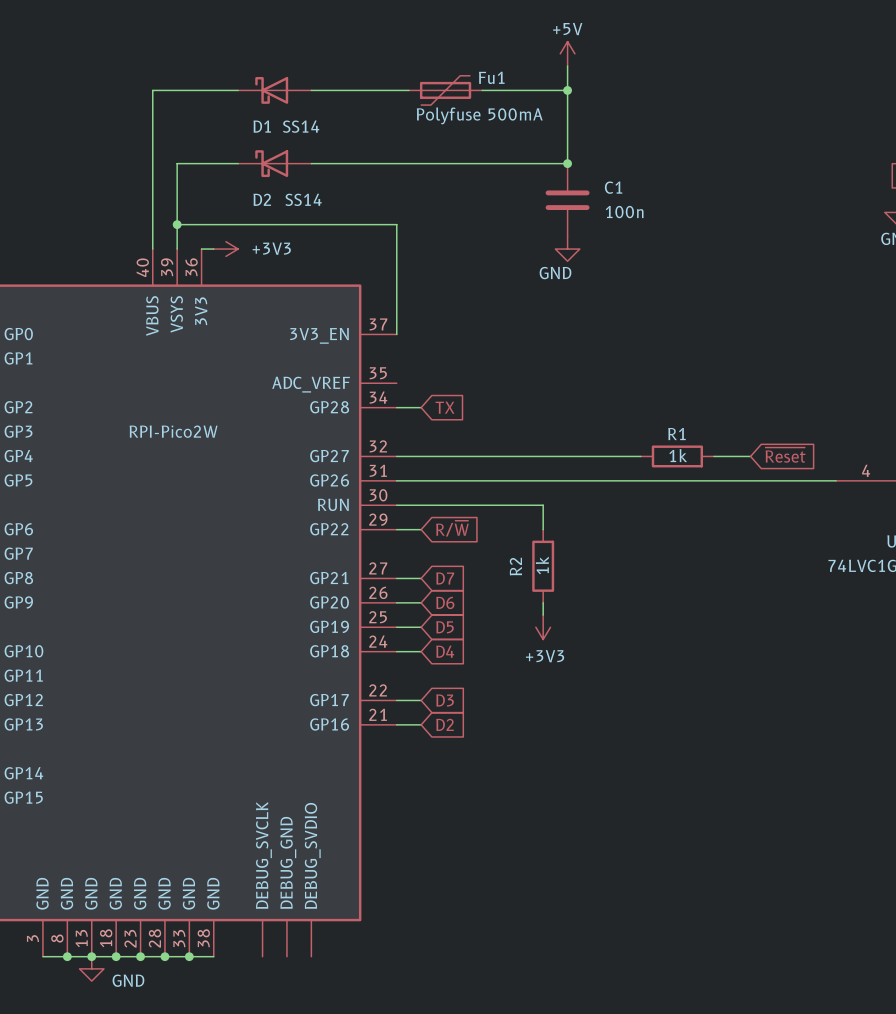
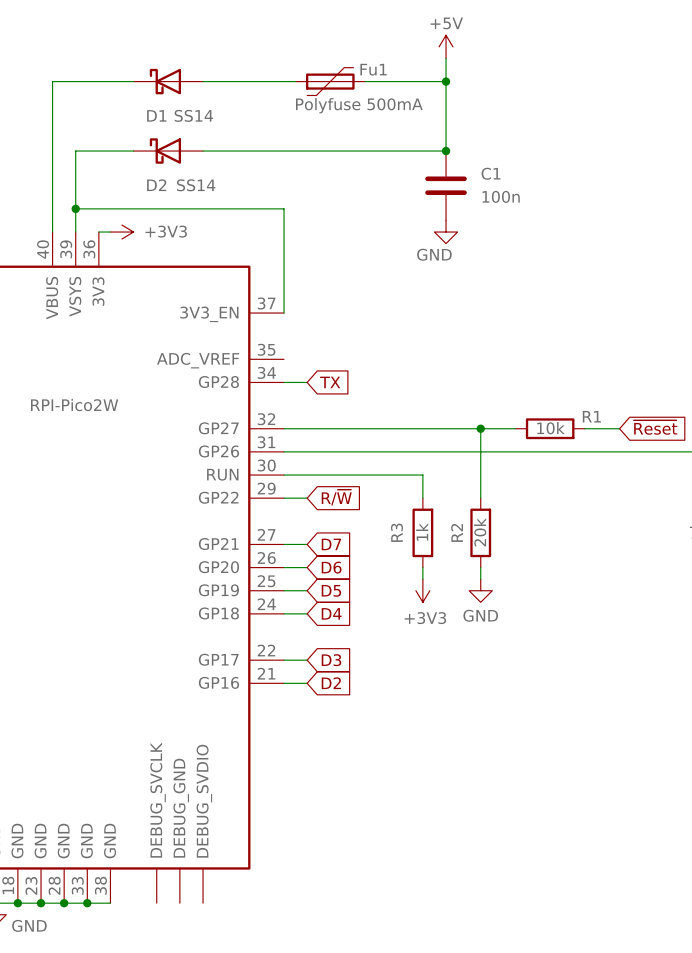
R1 name position: R1 (677, 434) -> R1 (591, 416)
R1 value: 1k (678, 455) -> 10k (551, 428)
wire: none -> (480, 428) (480, 498)
junction: none -> (480, 428)
R2 name: R2 (515, 566) -> R3 (396, 532)
R2: none -> 20k (480, 532)
wire: none -> (480, 567) (480, 579)
power symbol: none -> GND (480, 590)

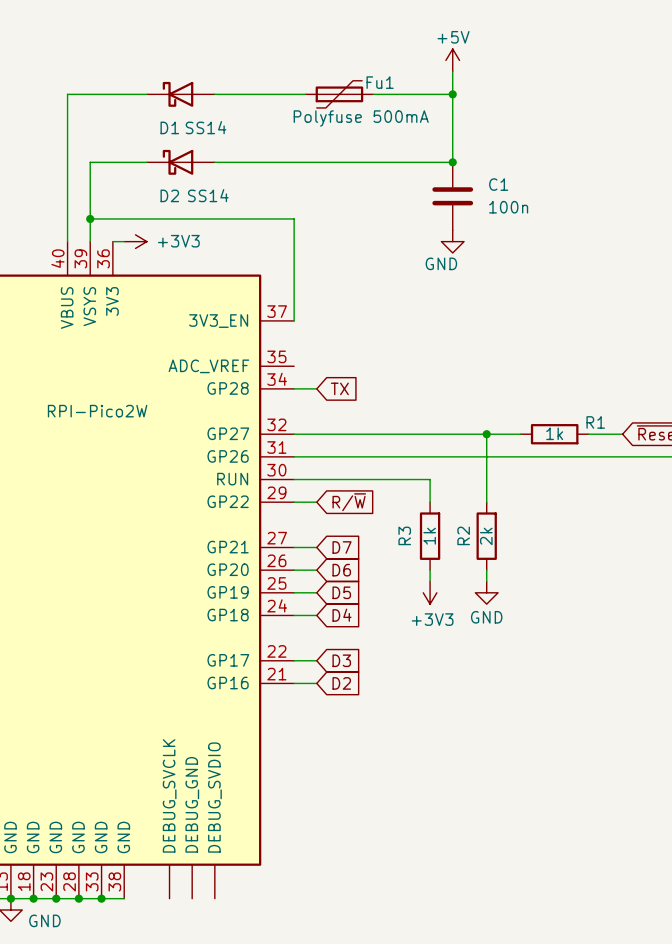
R1 value: 10k (551, 428) -> 1k (554, 433)
R2 value: 20k (480, 532) -> 2k (486, 536)

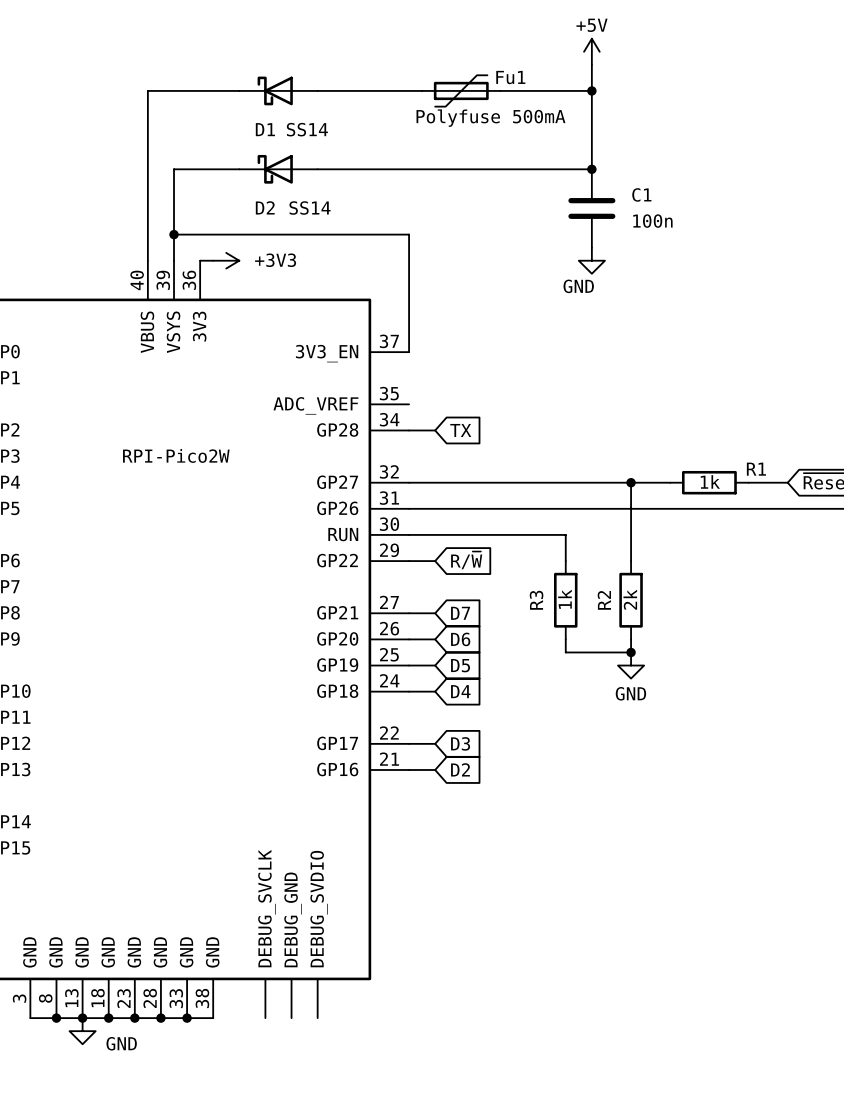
wire: none -> (565, 652) (631, 652)
junction: none -> (631, 652)
power symbol: +3V3 (430, 592) -> none

